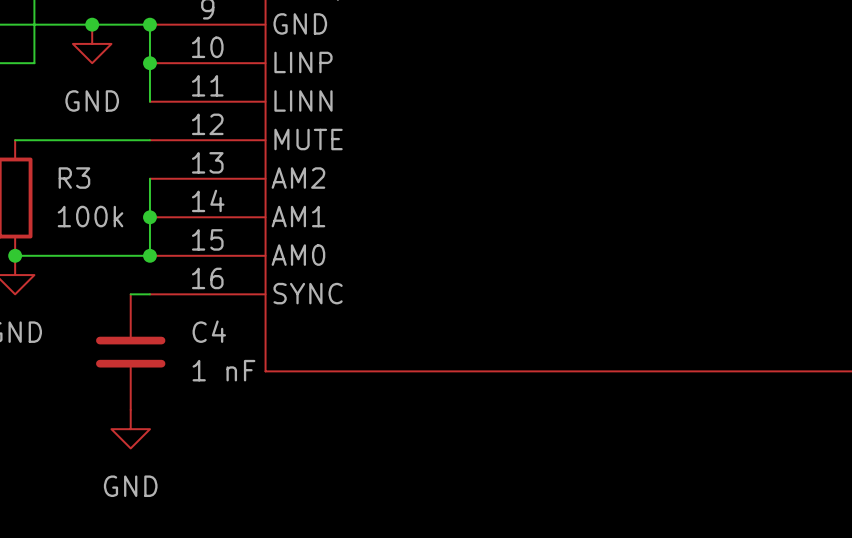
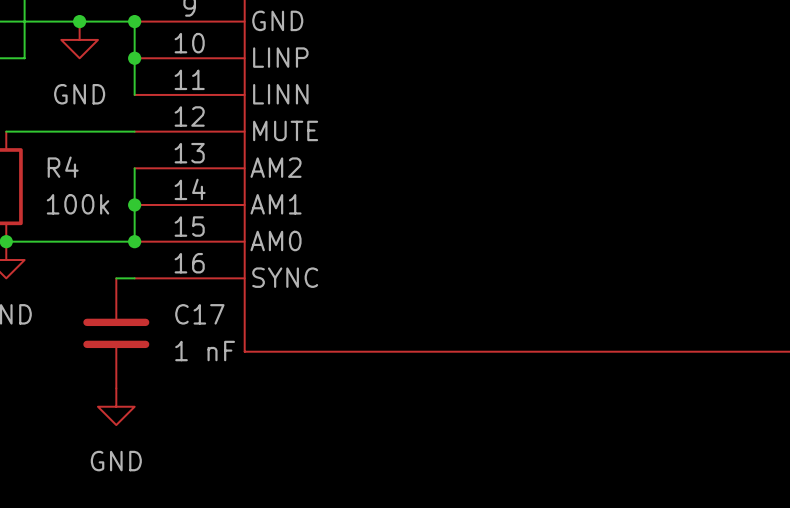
R3 name: R3 (74, 178) -> R4 (63, 167)
C4 name: C4 (209, 331) -> C17 (199, 314)

